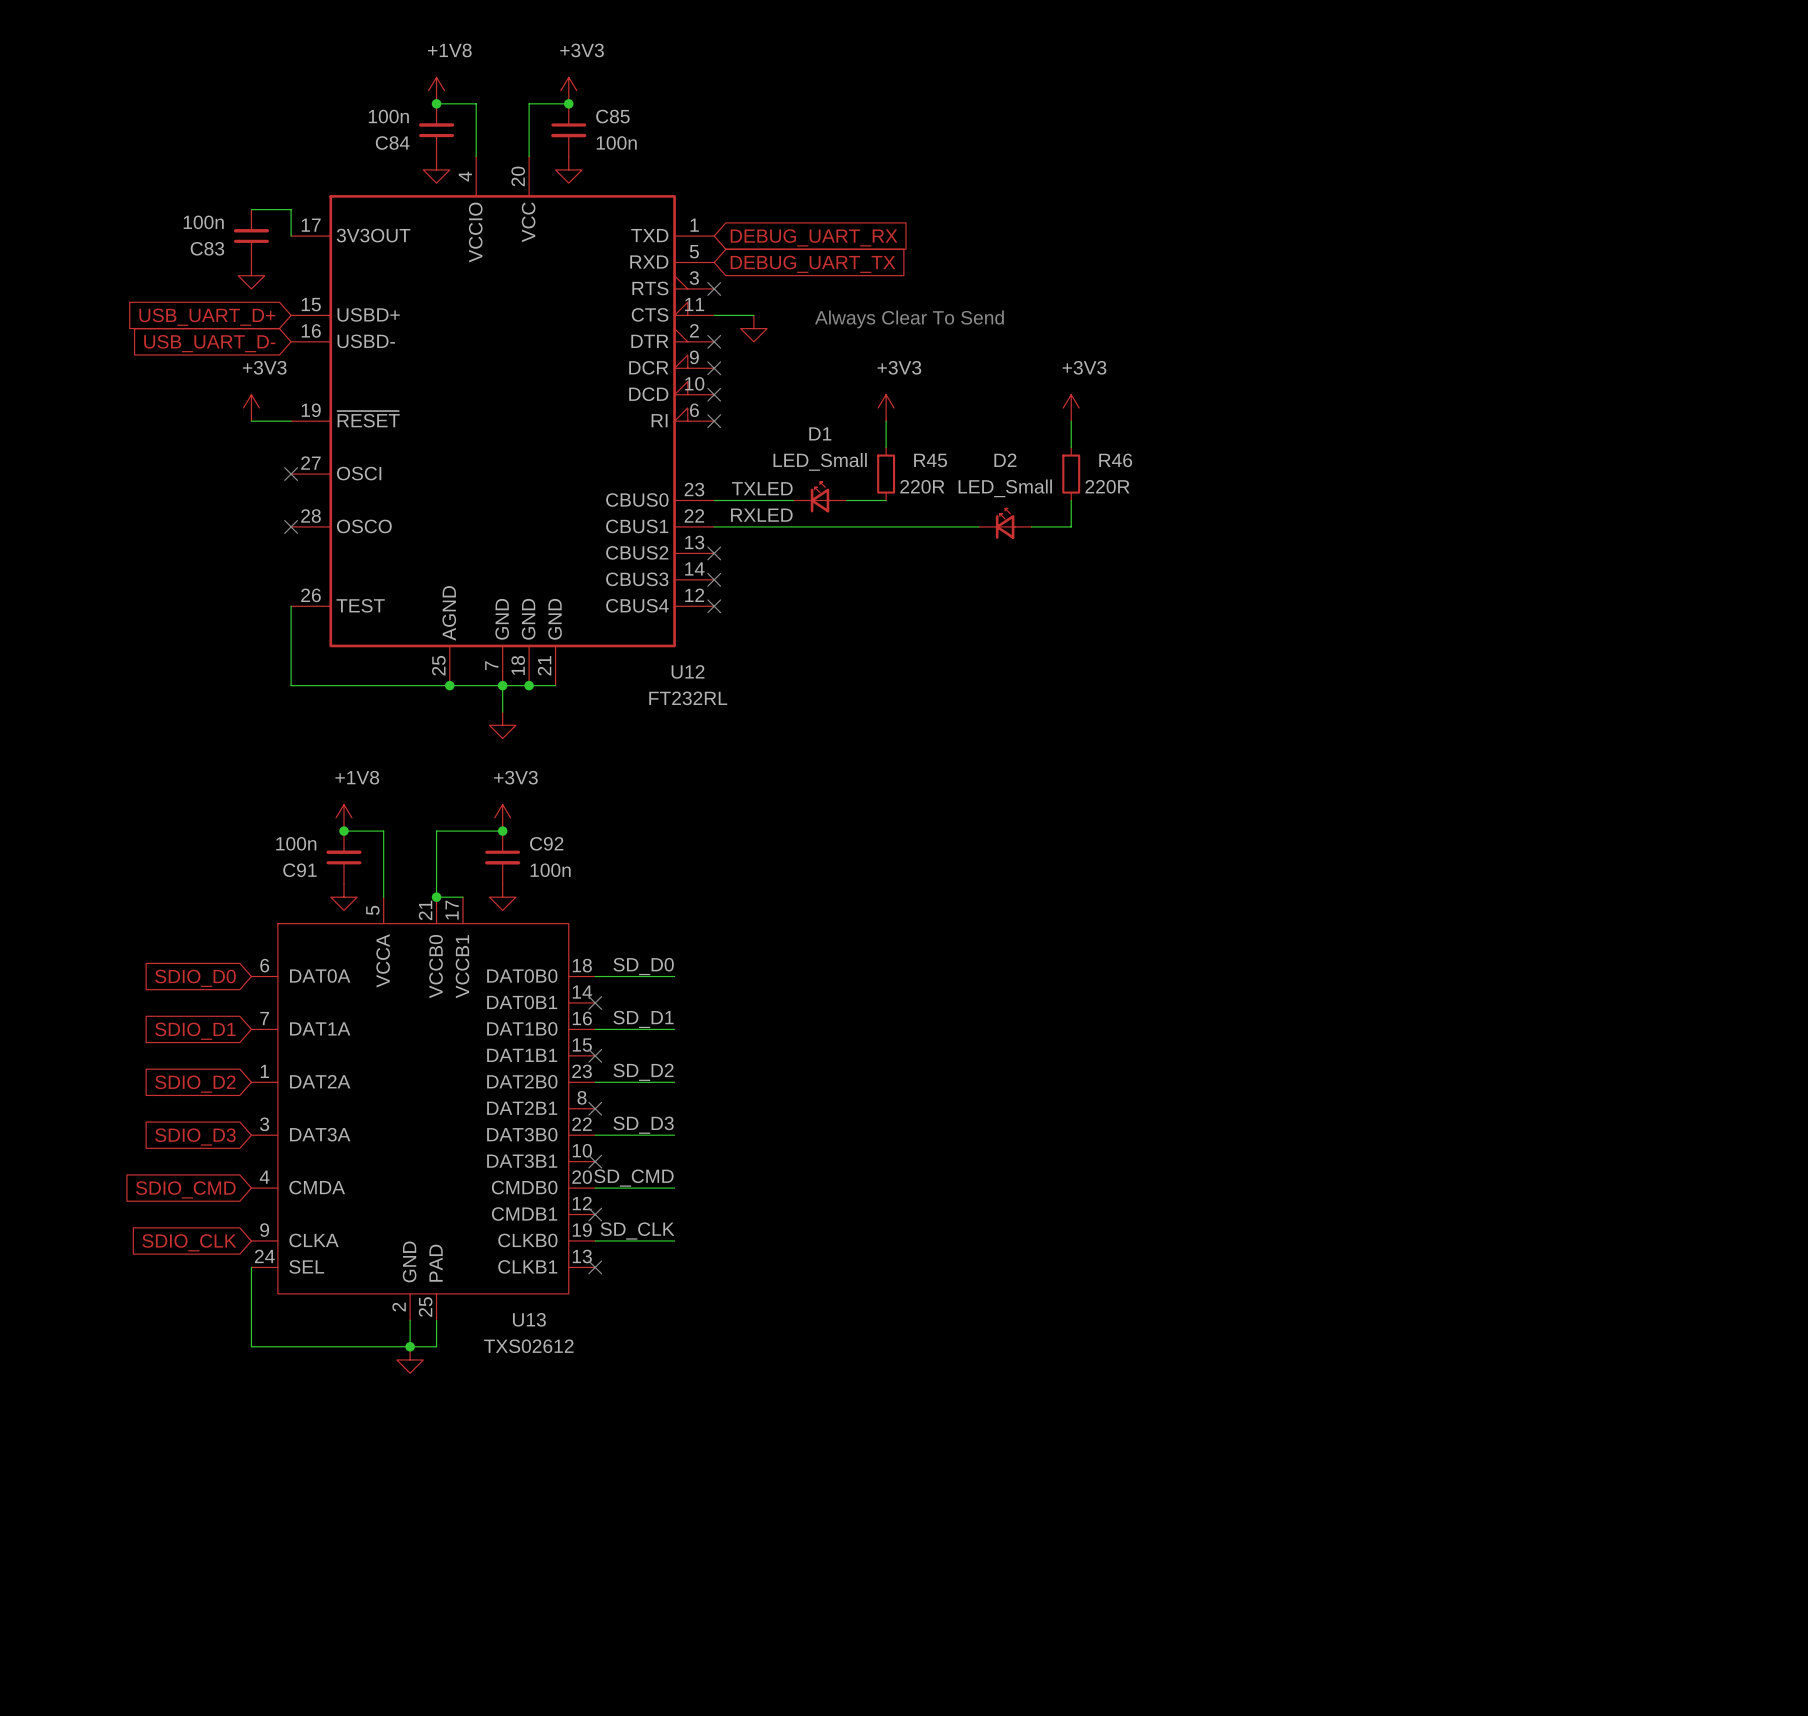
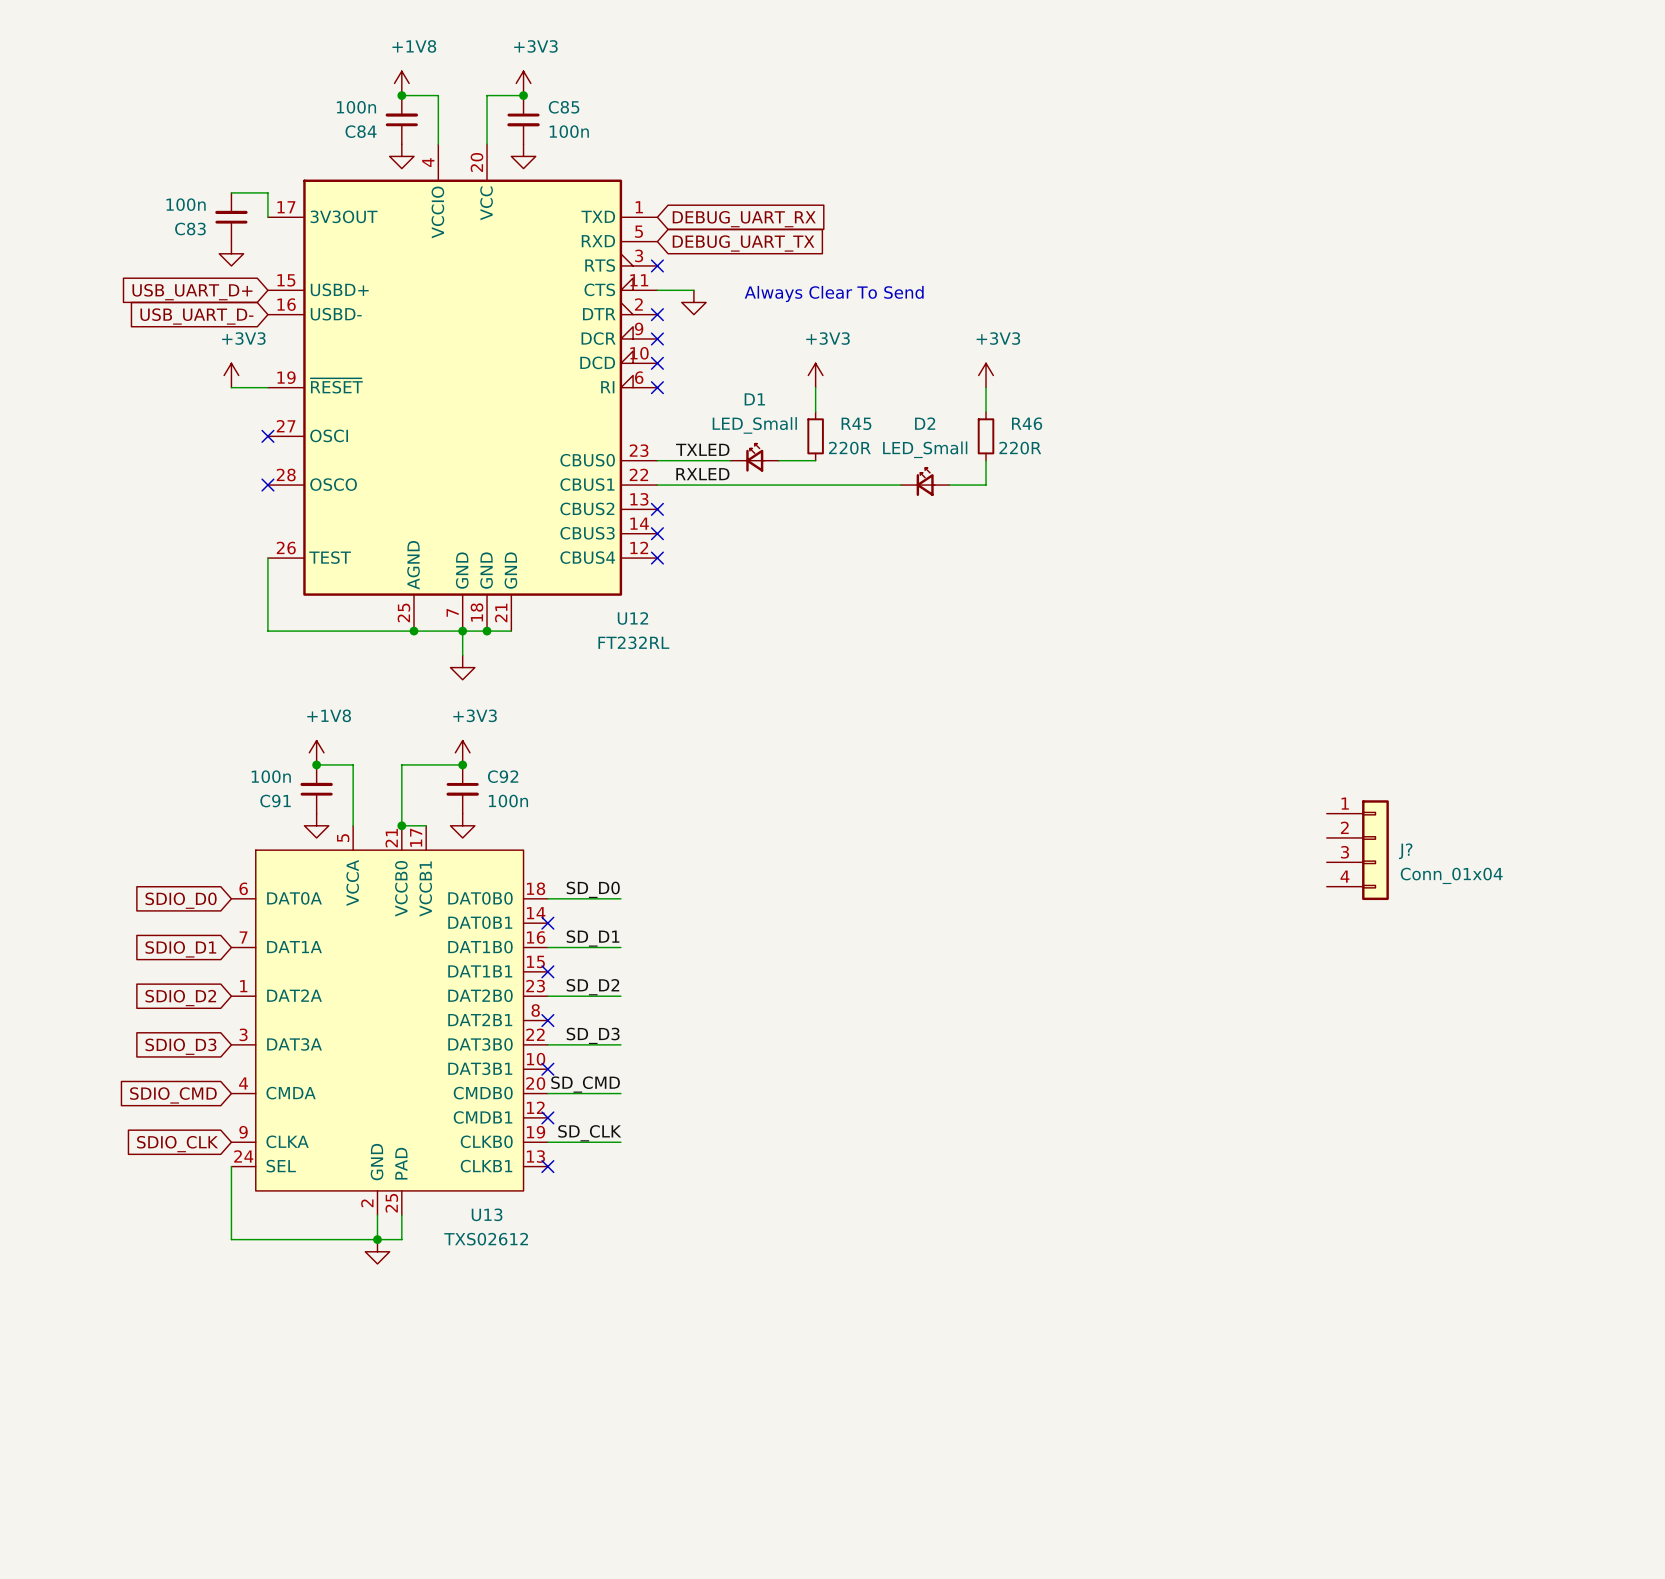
J?: none -> Conn_01x04 (1357, 850)

